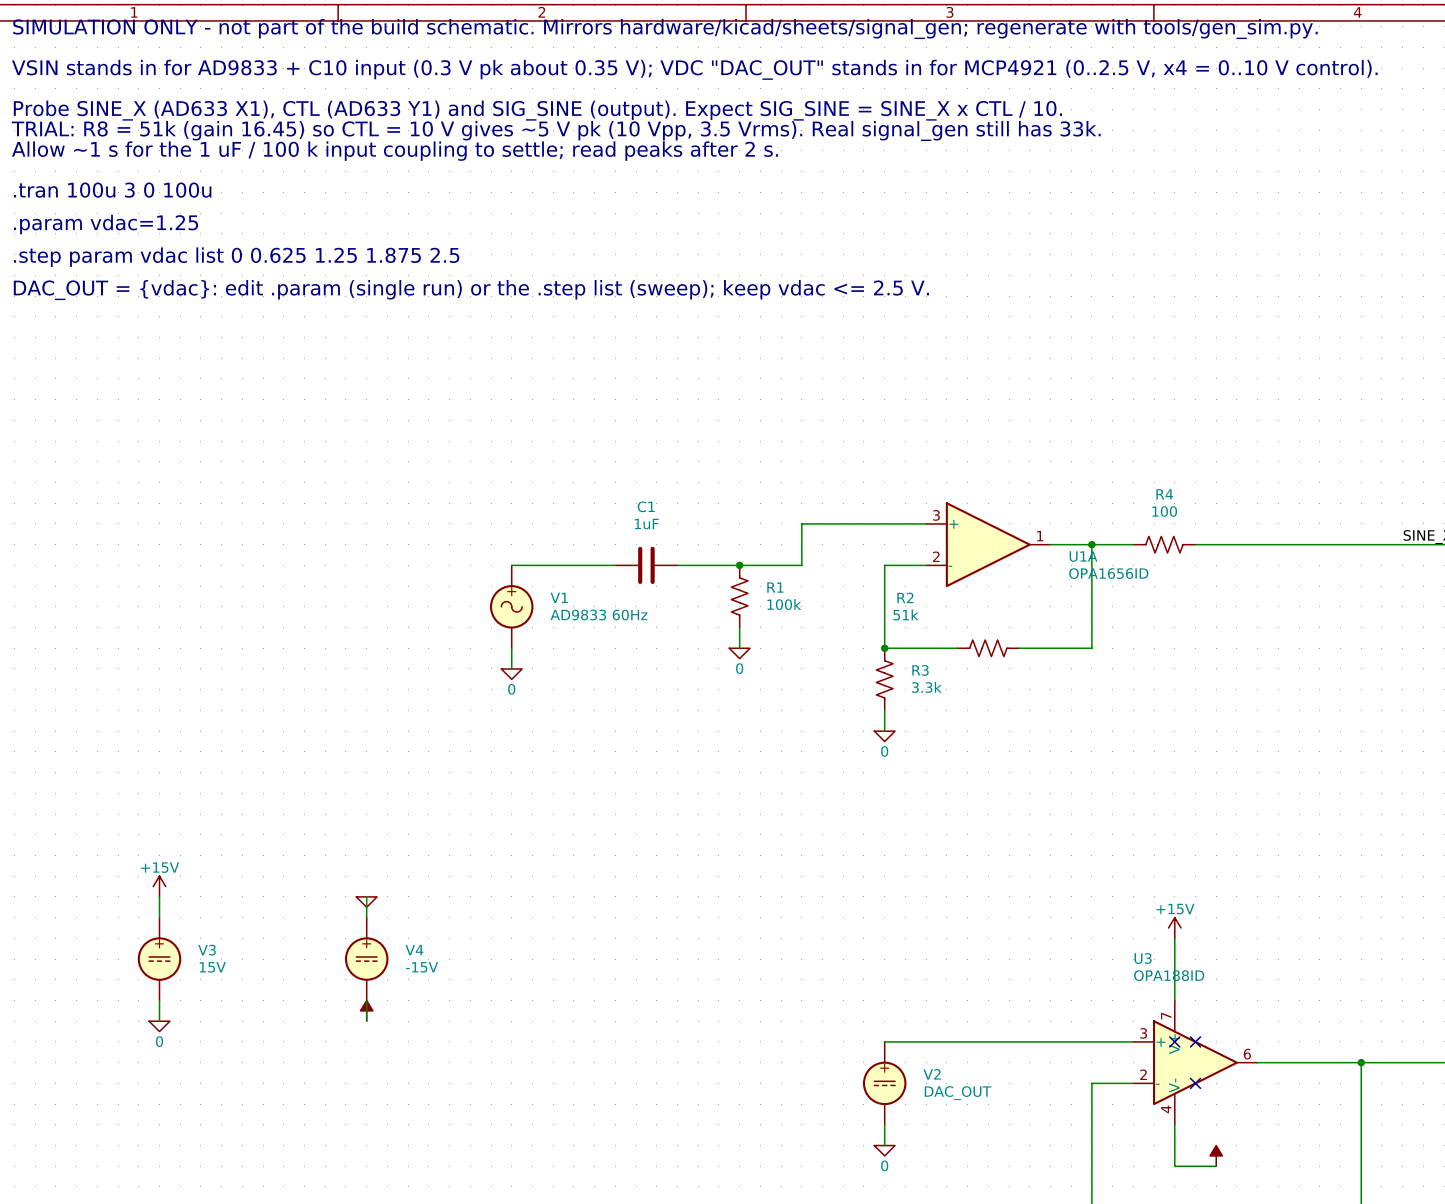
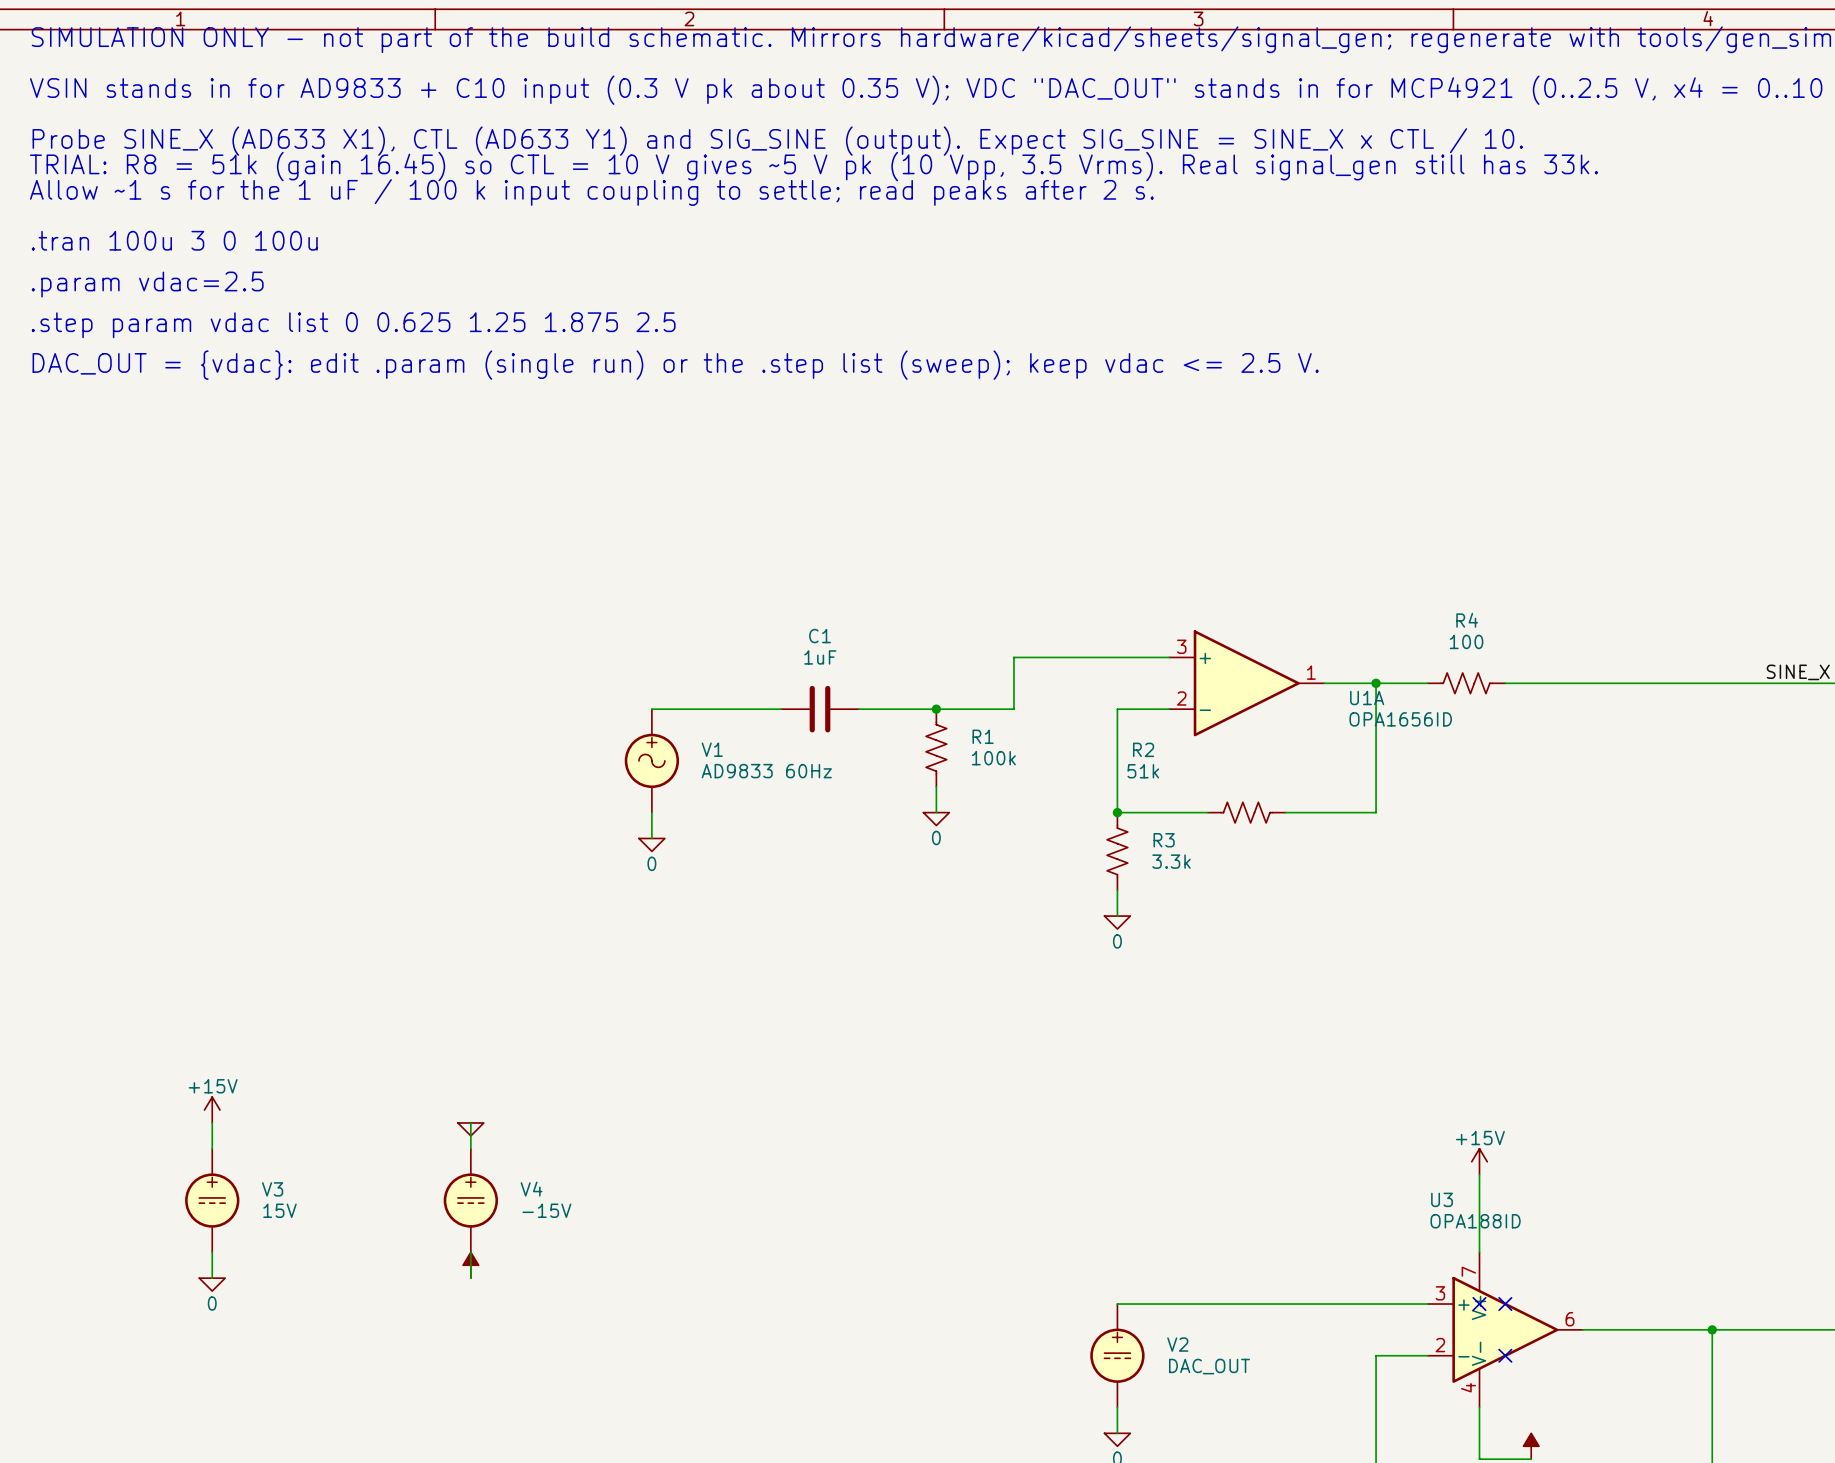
text: .param vdac=1.25 (106, 224) -> .param vdac=2.5 (147, 284)

